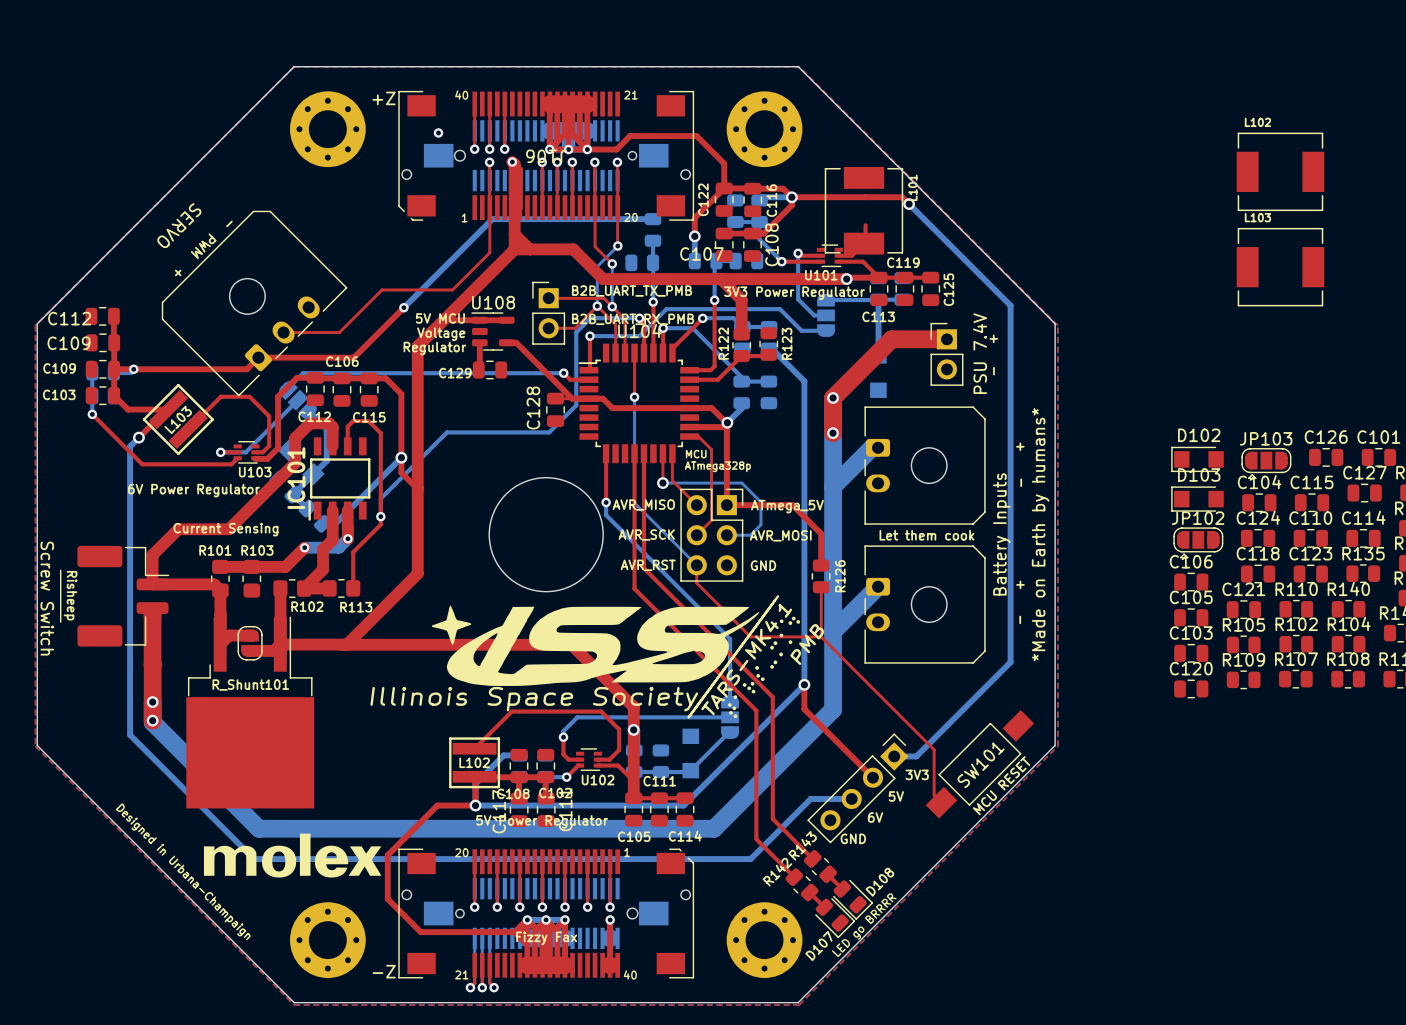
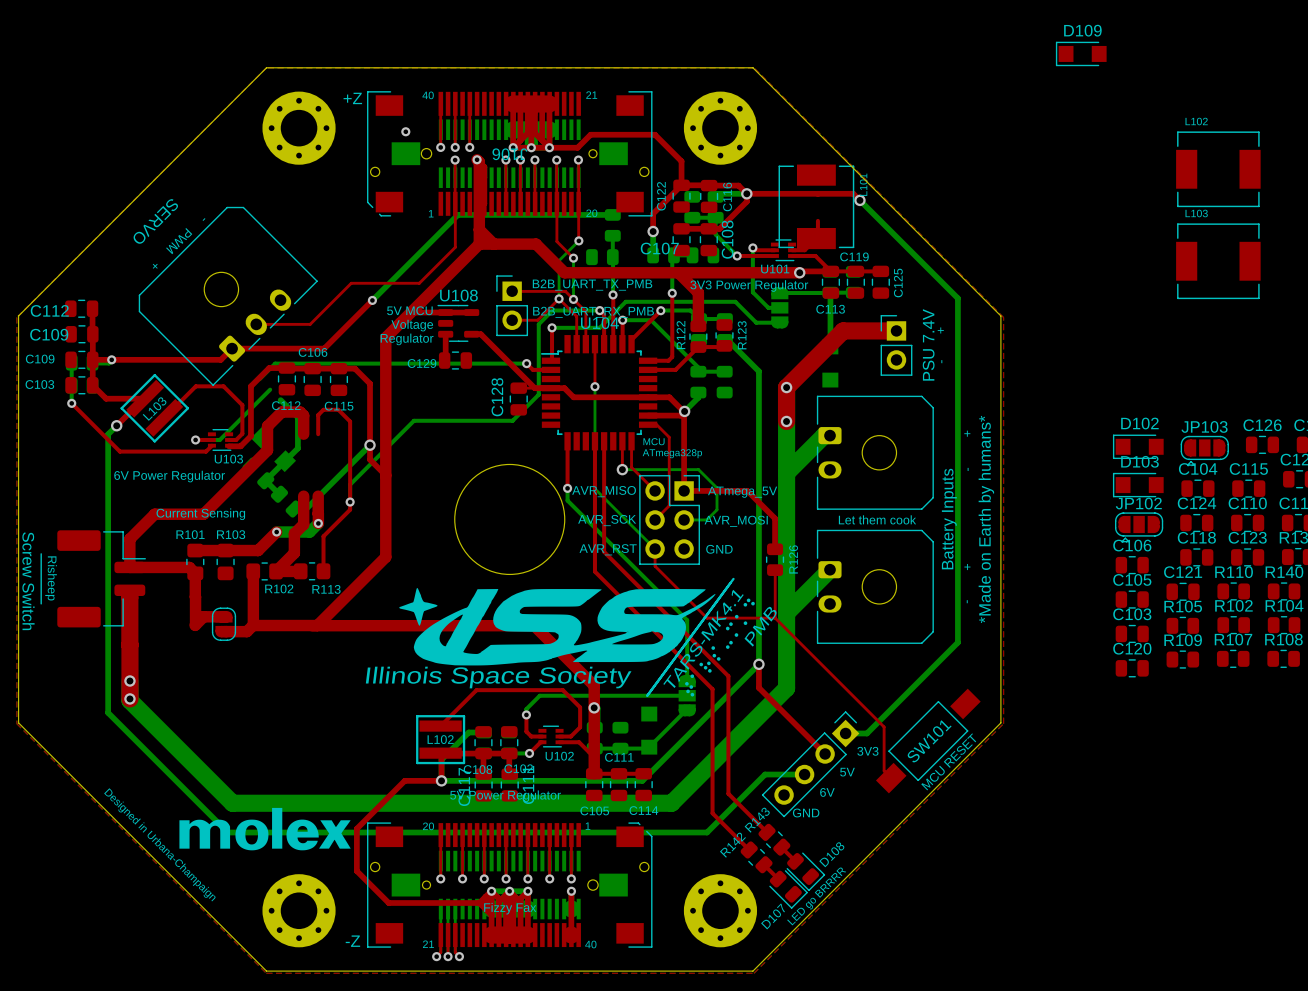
D109: none -> (1081, 53)
part: (297, 400) -> none
IC101: (339, 479) -> none
R_Shunt101: (250, 712) -> none

